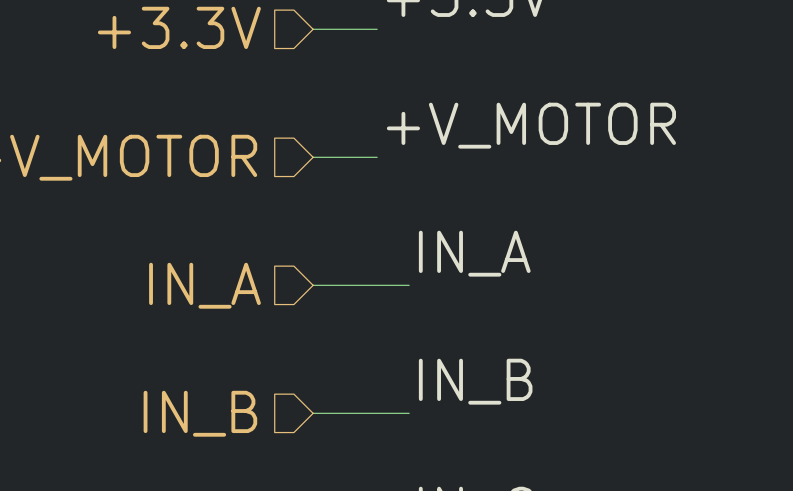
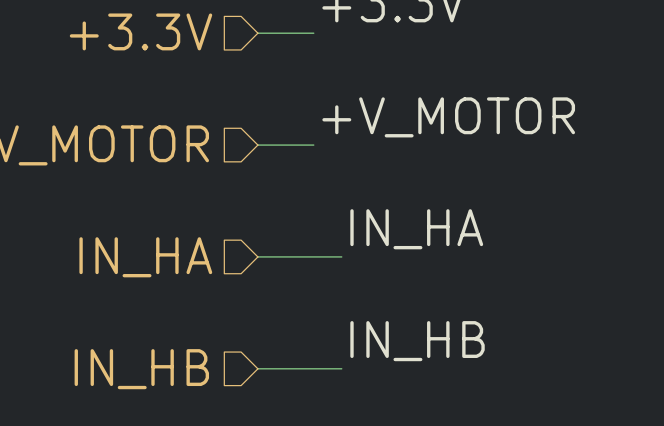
label: IN_A (474, 253) -> IN_HA (416, 229)
hierarchical label: IN_A (204, 285) -> IN_HA (145, 257)
label: IN_B (475, 381) -> IN_HB (417, 341)
hierarchical label: IN_B (200, 413) -> IN_HB (141, 369)

